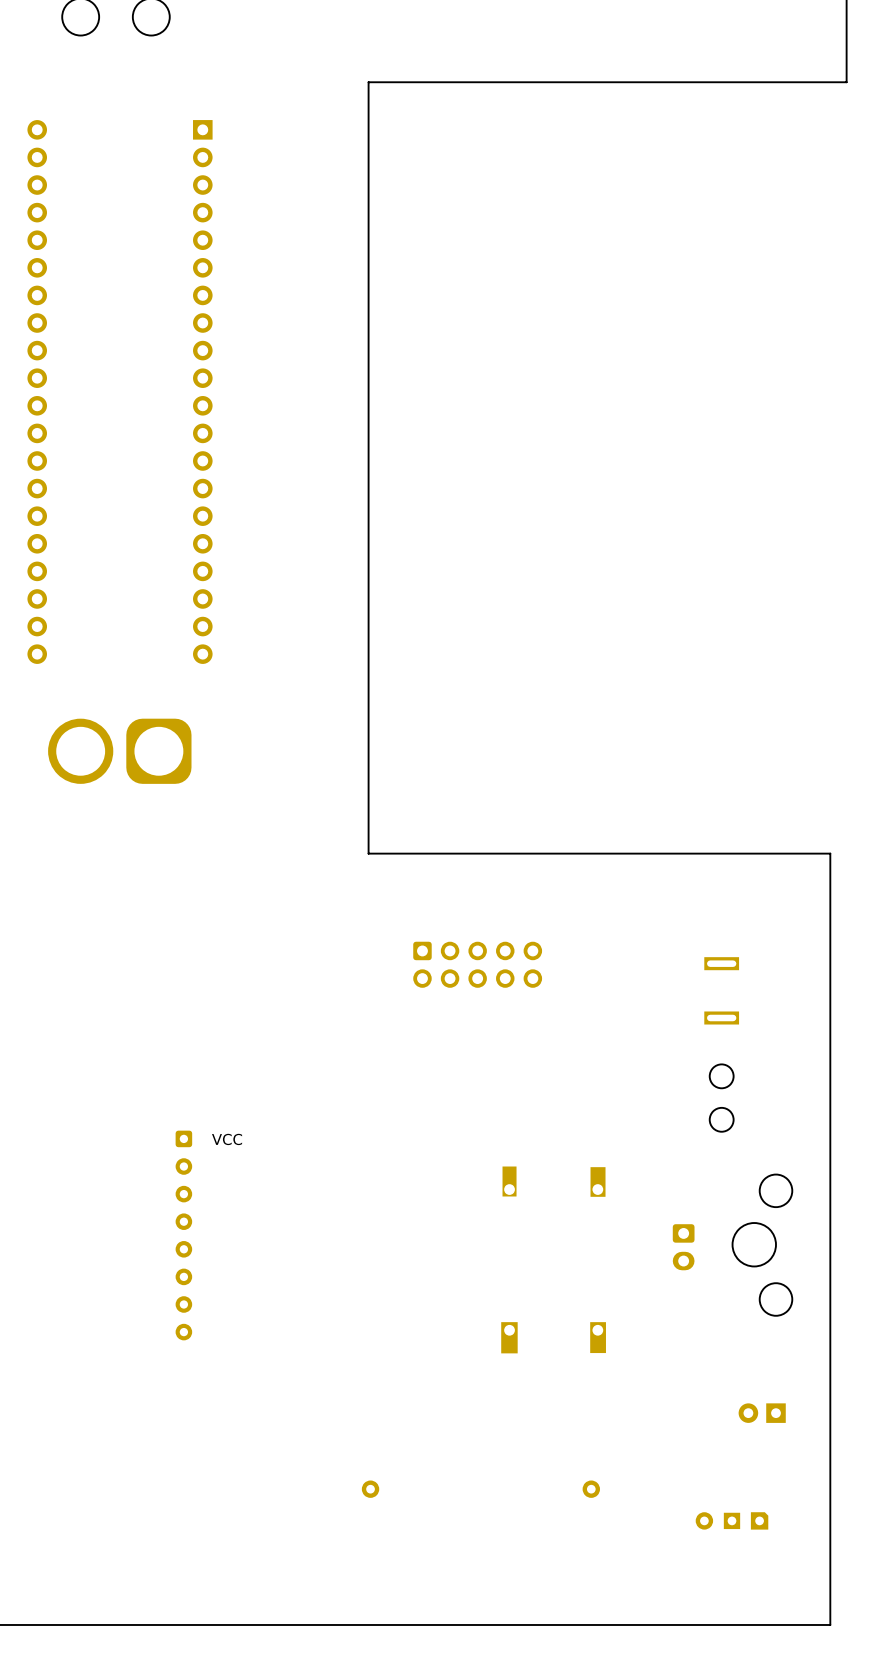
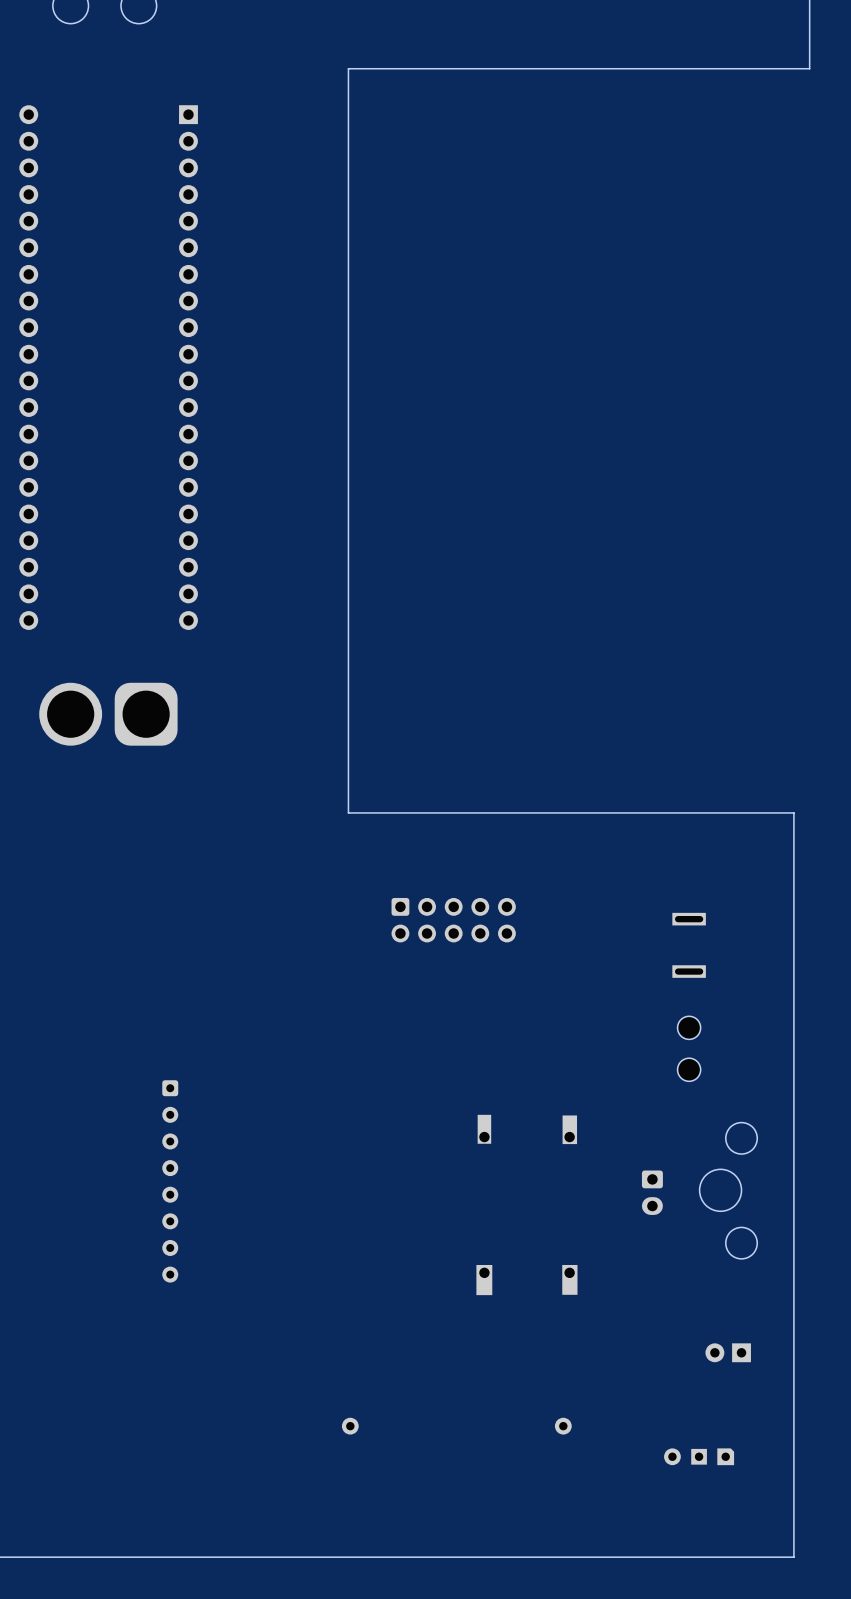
part text: VCC (227, 1139) -> none

